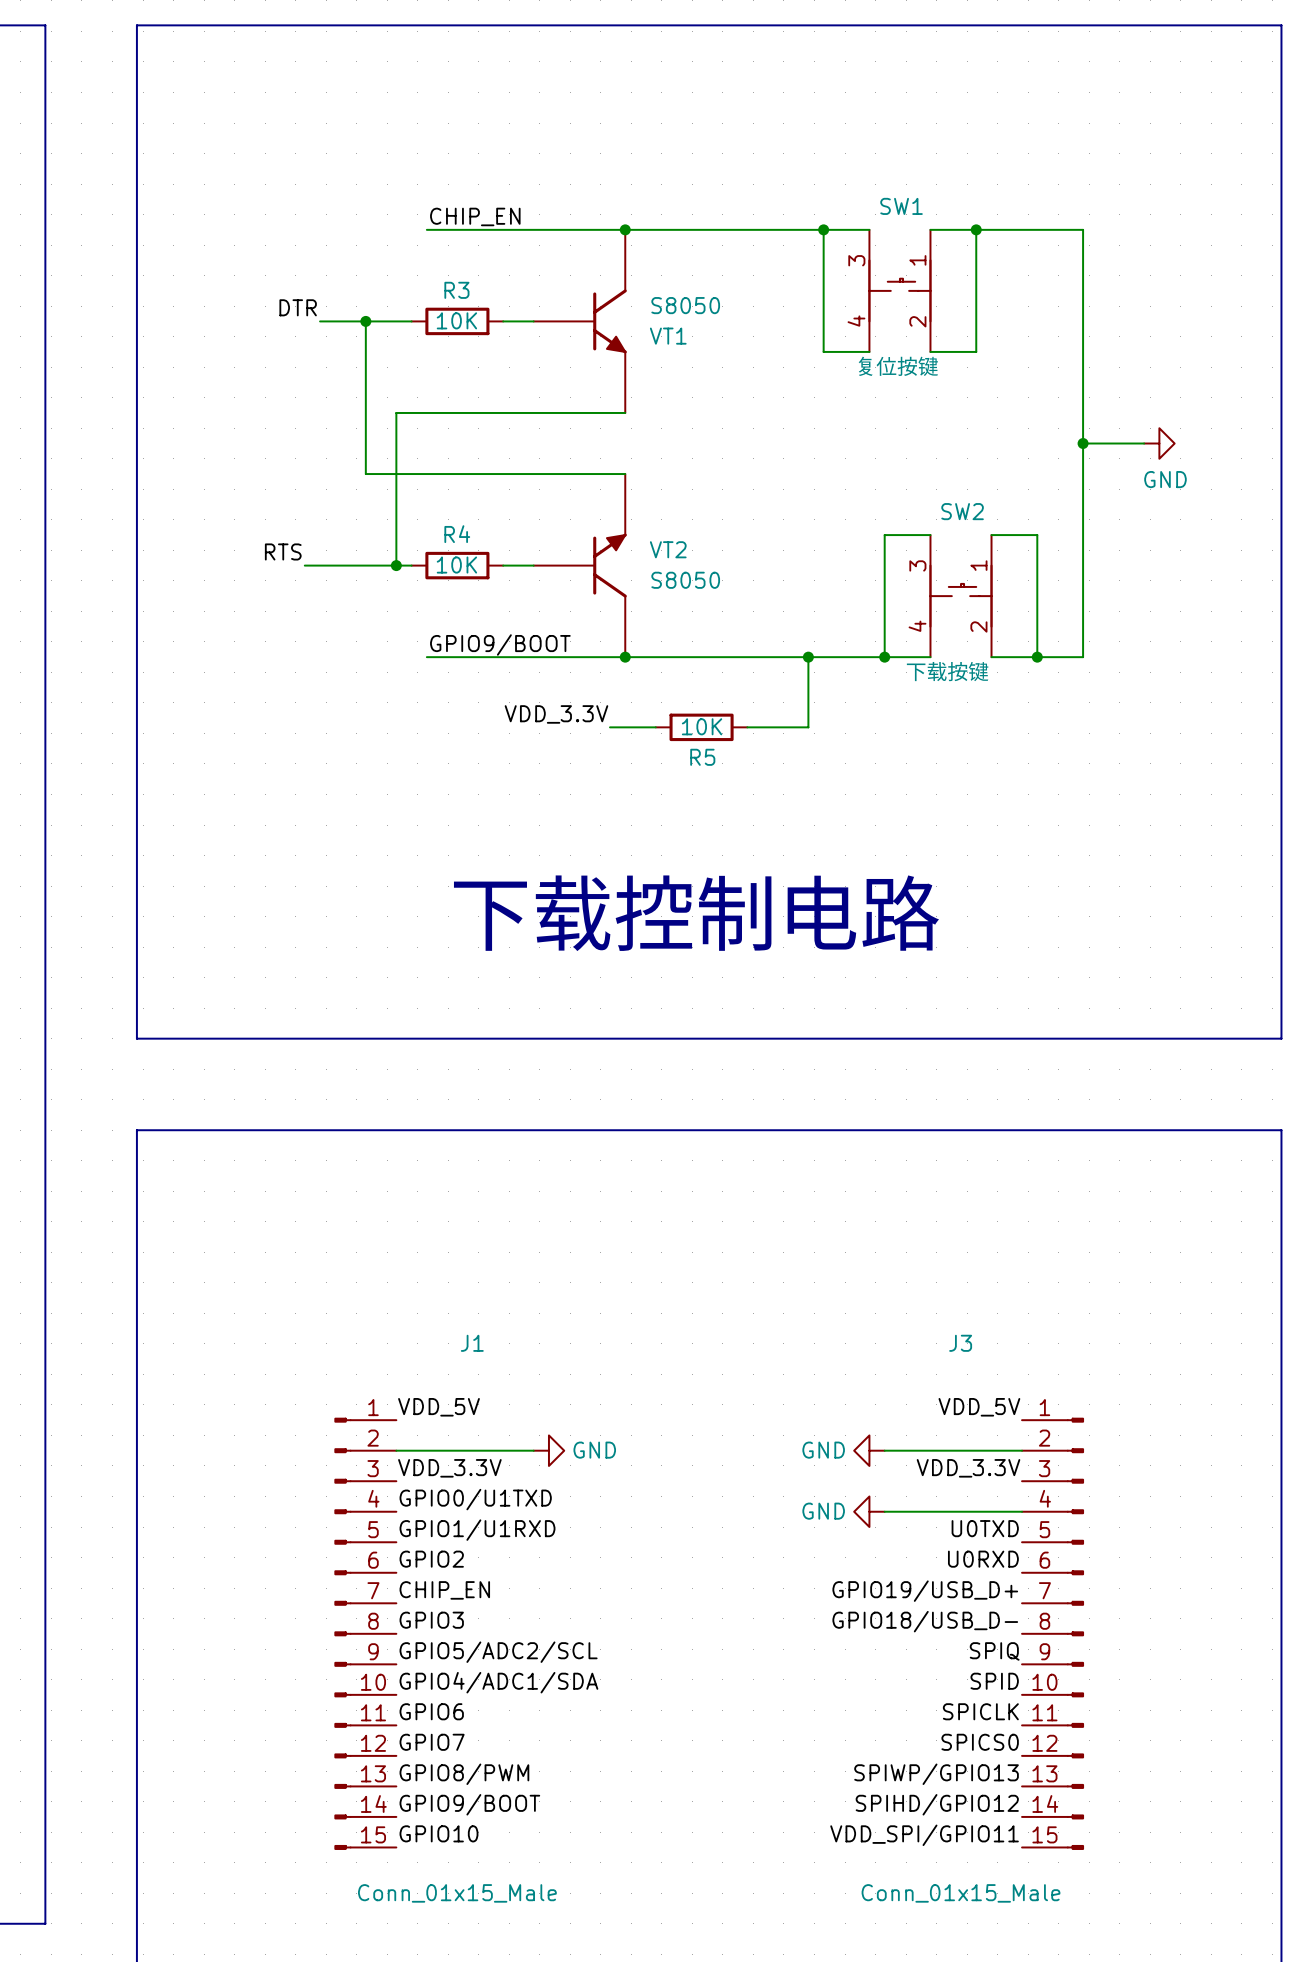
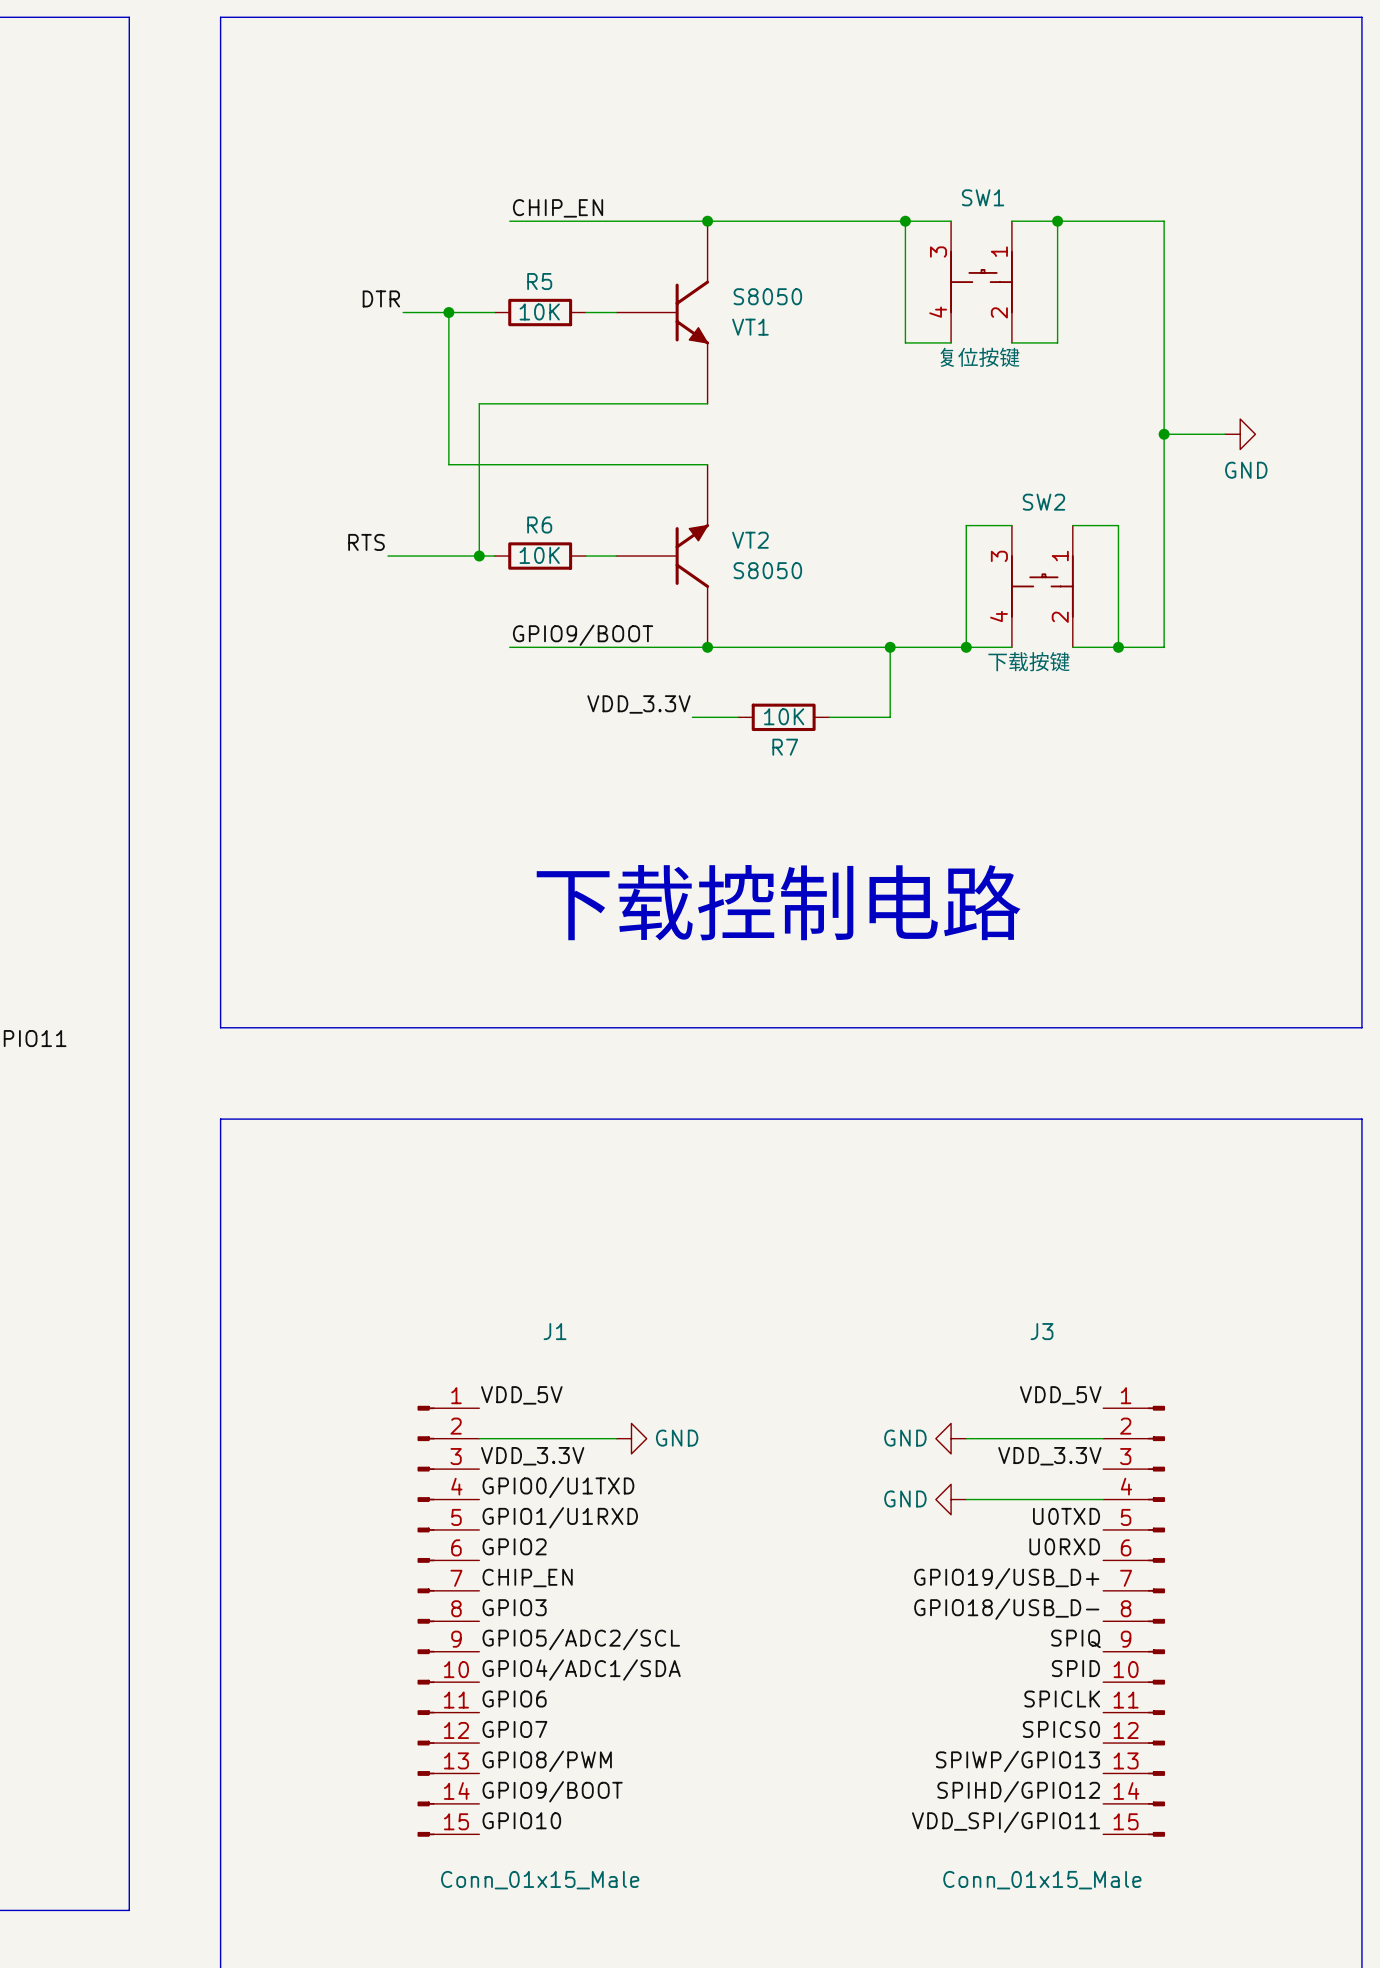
R3 name: R3 (456, 290) -> R5 (539, 281)
R4 name: R4 (457, 534) -> R6 (539, 525)
R5 name: R5 (702, 757) -> R7 (785, 747)

